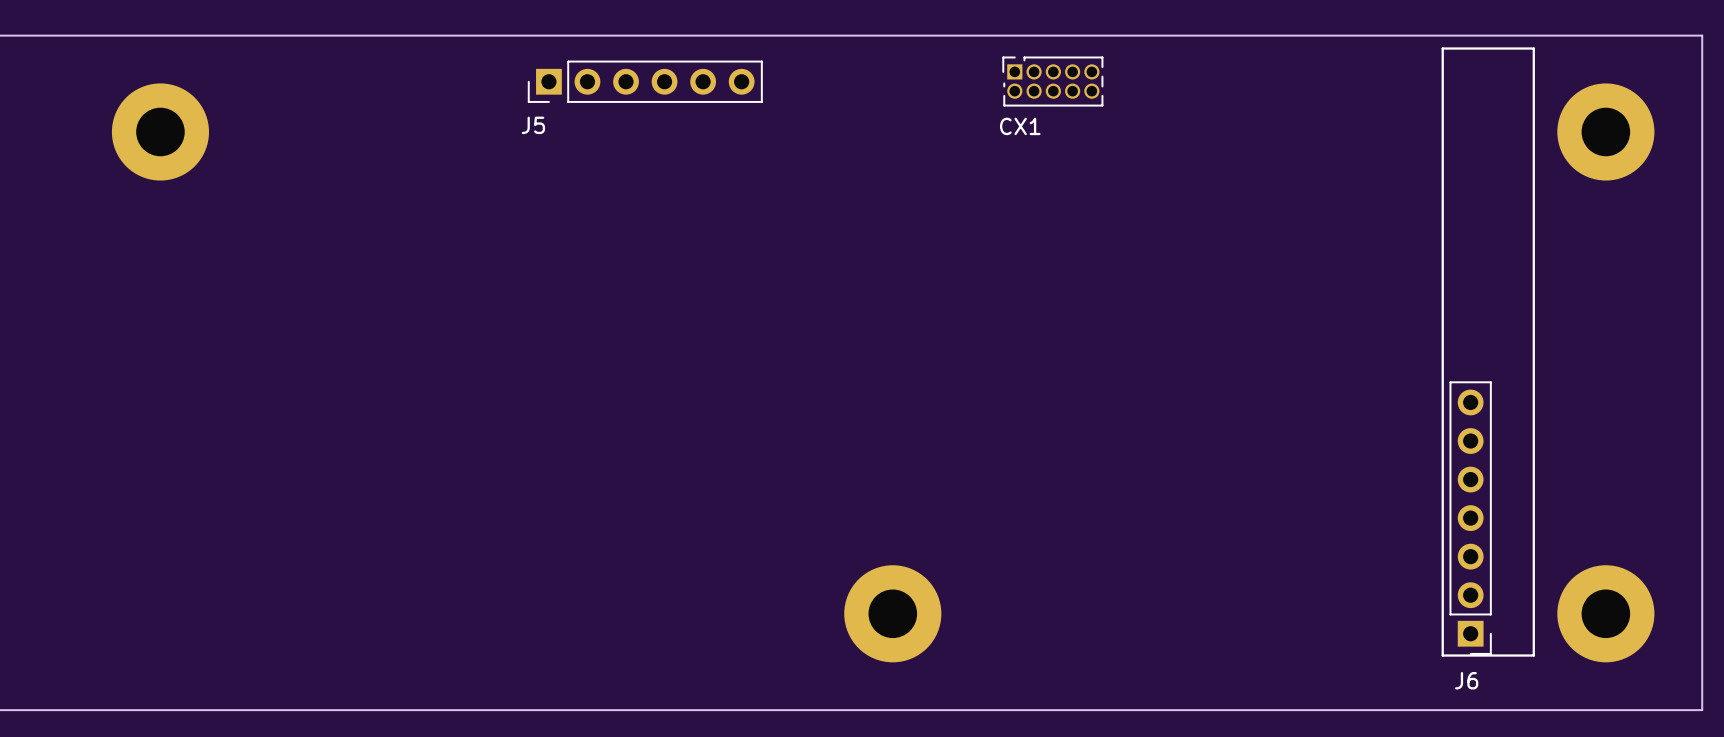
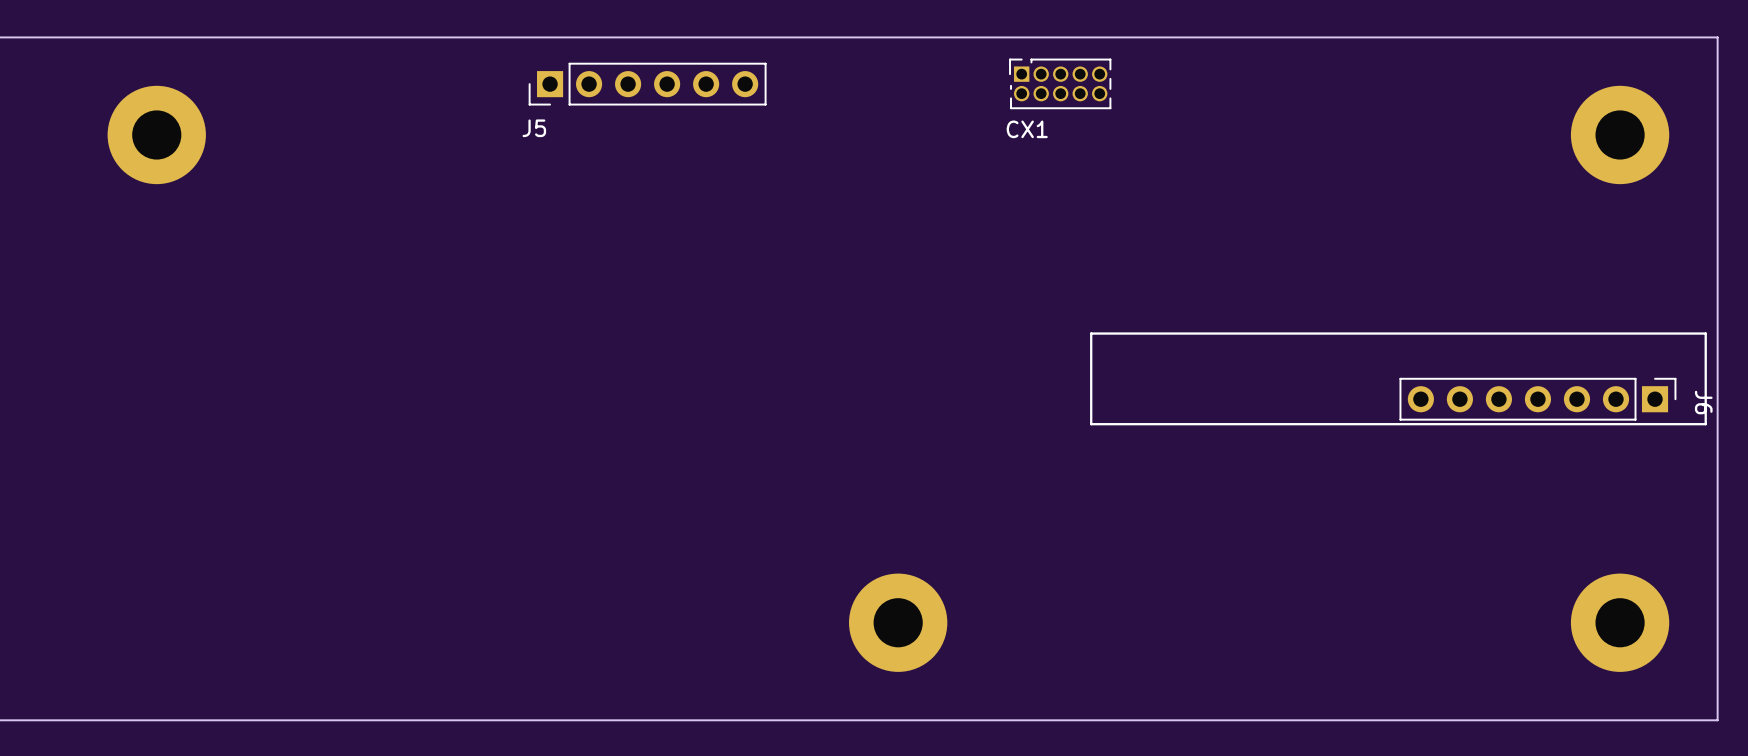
line: (1533, 48) (1442, 48) (1442, 655) (1533, 655) (1533, 48) -> none
line: none -> (1705, 333) (1091, 333) (1091, 424) (1705, 424) (1705, 333)
J6 rotation: 0° (1470, 518) -> 90° counterclockwise (1537, 399)

